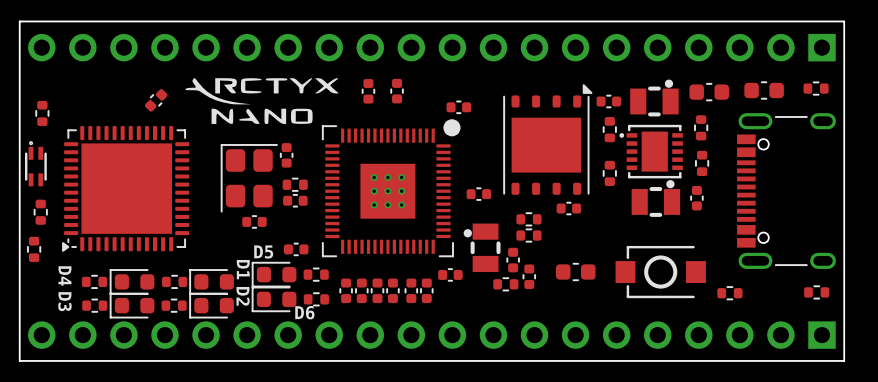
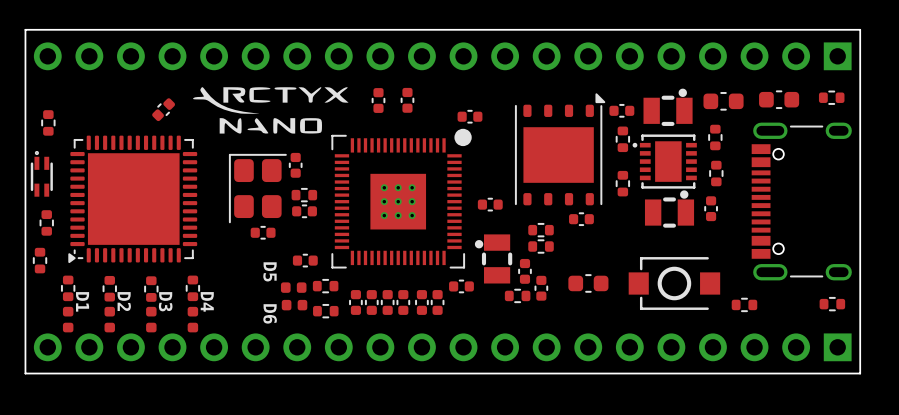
text rotation: 0° (263, 251) -> 90° clockwise (269, 271)
part footprint: [251, 261, 297, 288] -> [280, 282, 307, 293]
part footprint: [109, 269, 155, 295] -> [144, 276, 159, 302]
text position: D1 (243, 269) -> D1 (82, 301)
text position: D4 (64, 275) -> D4 (207, 301)
part: none -> (68, 288)
part rotation: 0° (94, 281) -> 90° clockwise (109, 288)
part rotation: 0° (174, 281) -> 90° clockwise (192, 288)
part: (211, 281) -> none
part footprint: [109, 292, 155, 319] -> [146, 306, 157, 333]
part: none -> (294, 305)
text position: D2 (243, 296) -> D2 (124, 301)
part footprint: [82, 298, 108, 313] -> [104, 306, 115, 333]
part footprint: [161, 298, 187, 313] -> [187, 306, 199, 333]
part: (274, 299) -> none
text position: D3 (64, 301) -> D3 (165, 301)
part: (211, 305) -> none
part: none -> (68, 319)
text rotation: 0° (304, 312) -> 90° clockwise (270, 313)
text position: D6 (304, 312) -> D6 (270, 313)

